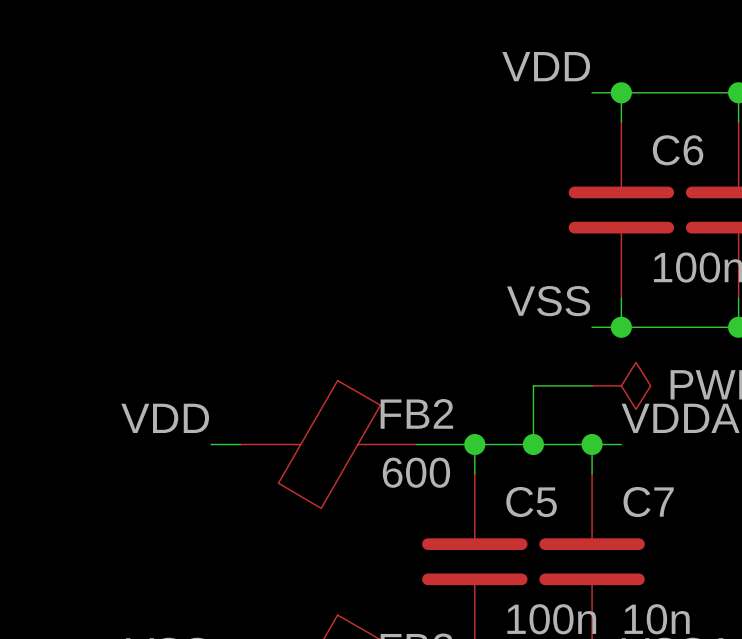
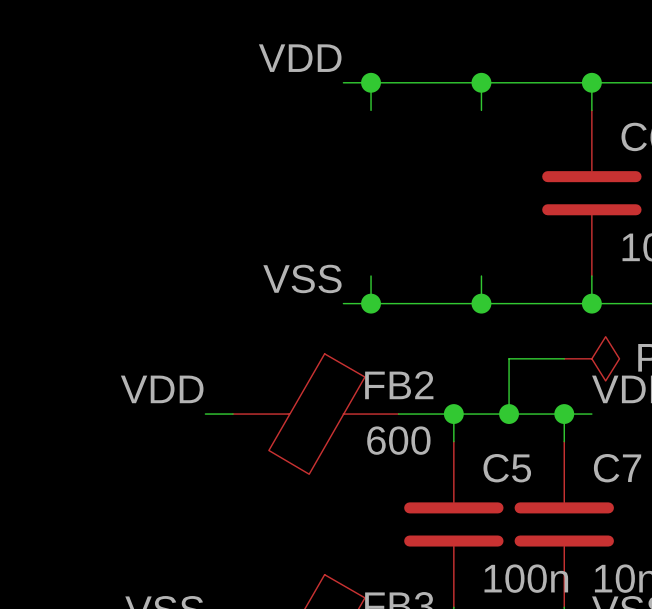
label position: VDD (546, 66) -> VDD (300, 58)
wire: none -> (343, 82) (564, 82)
wire: none -> (371, 82) (371, 110)
junction: none -> (371, 82)
wire: none -> (481, 82) (481, 110)
junction: none -> (481, 82)
wire: none -> (371, 276) (371, 303)
wire: none -> (481, 276) (481, 303)
label position: VSS (548, 301) -> VSS (302, 278)
wire: none -> (343, 303) (564, 303)
junction: none -> (371, 303)
junction: none -> (481, 303)

